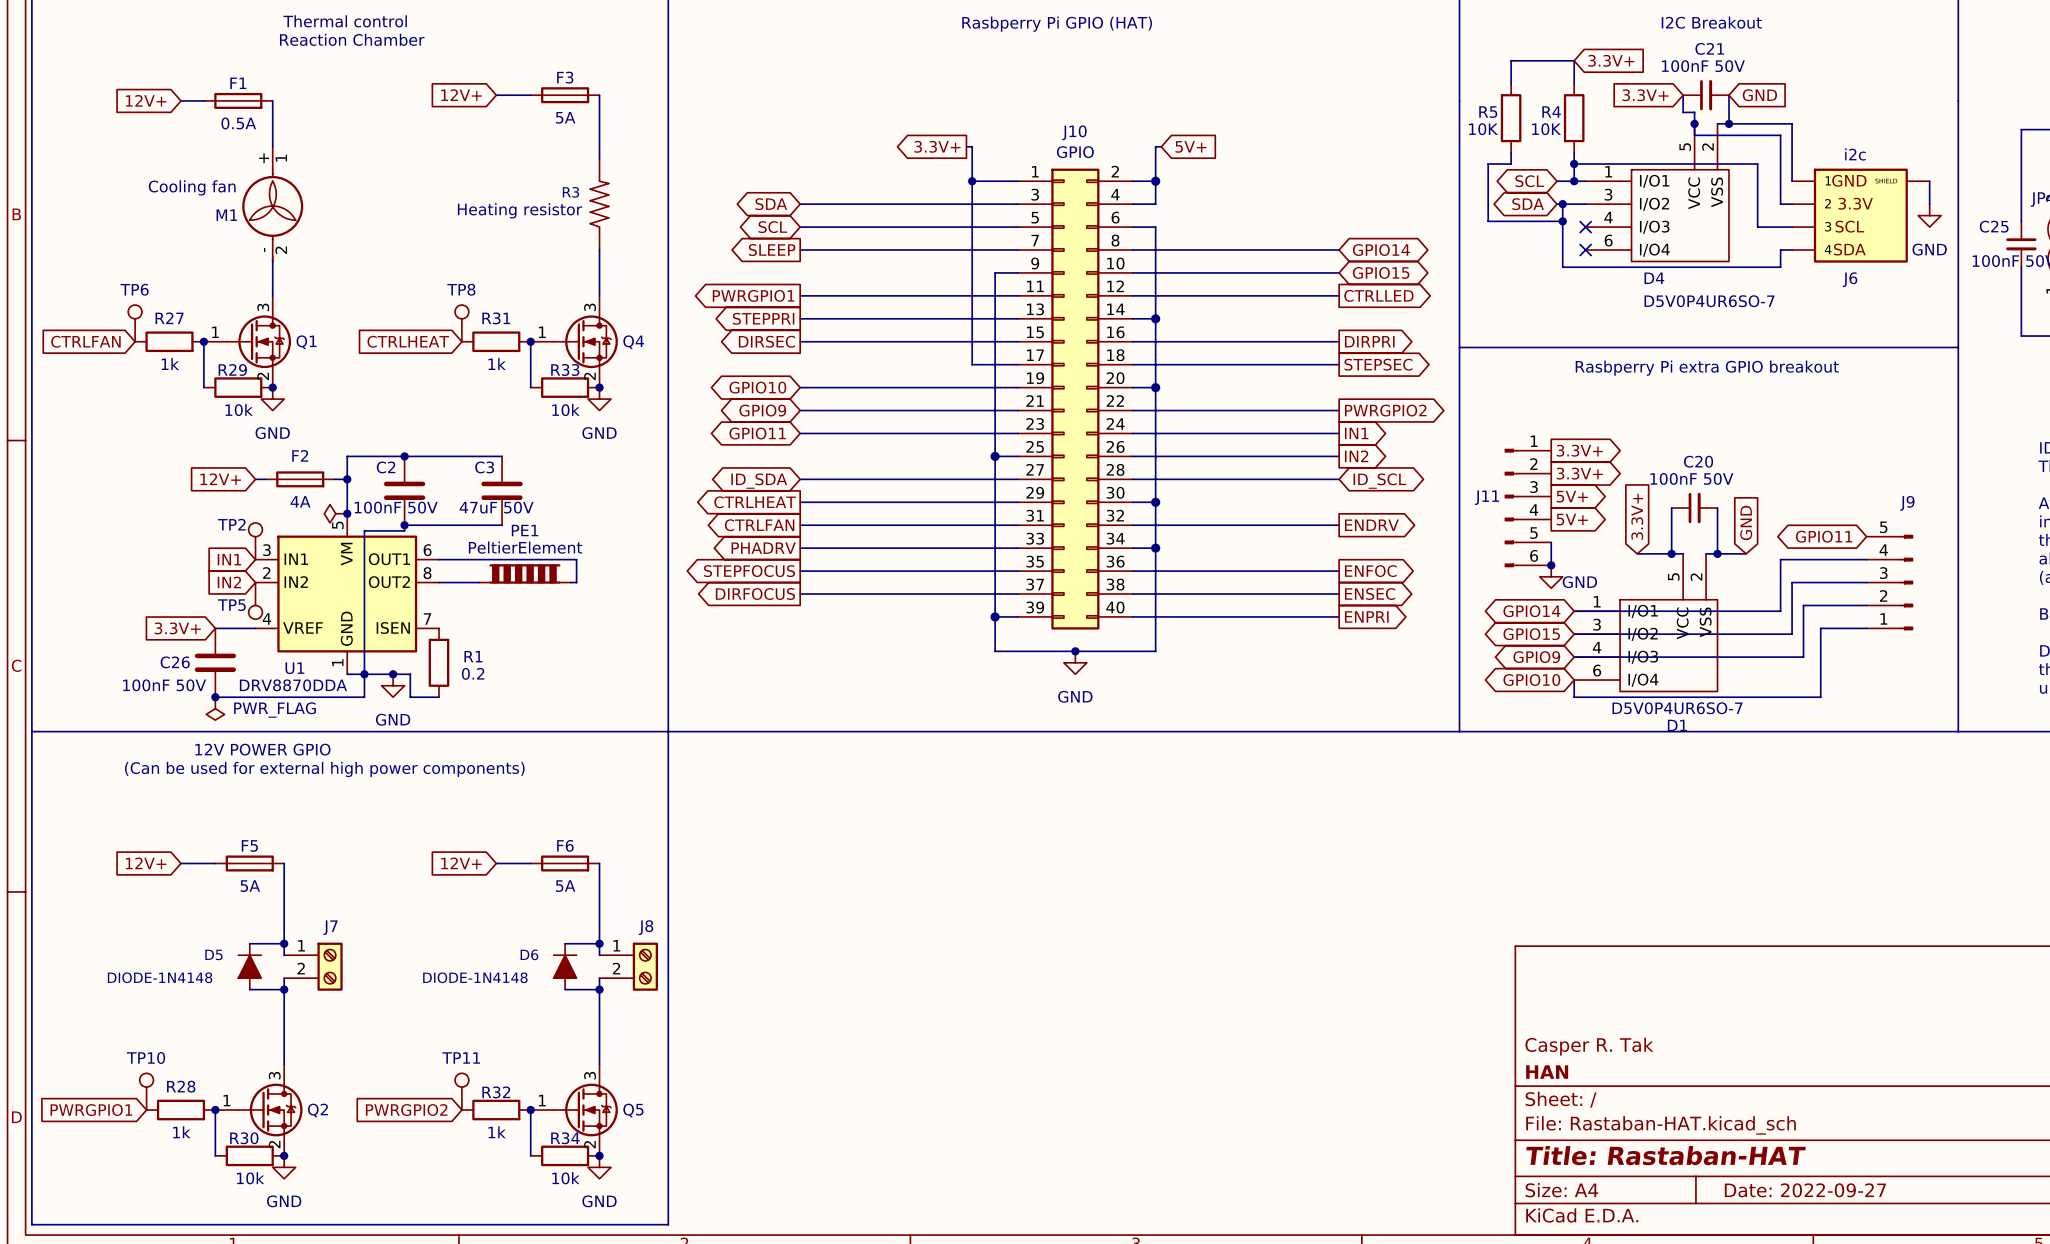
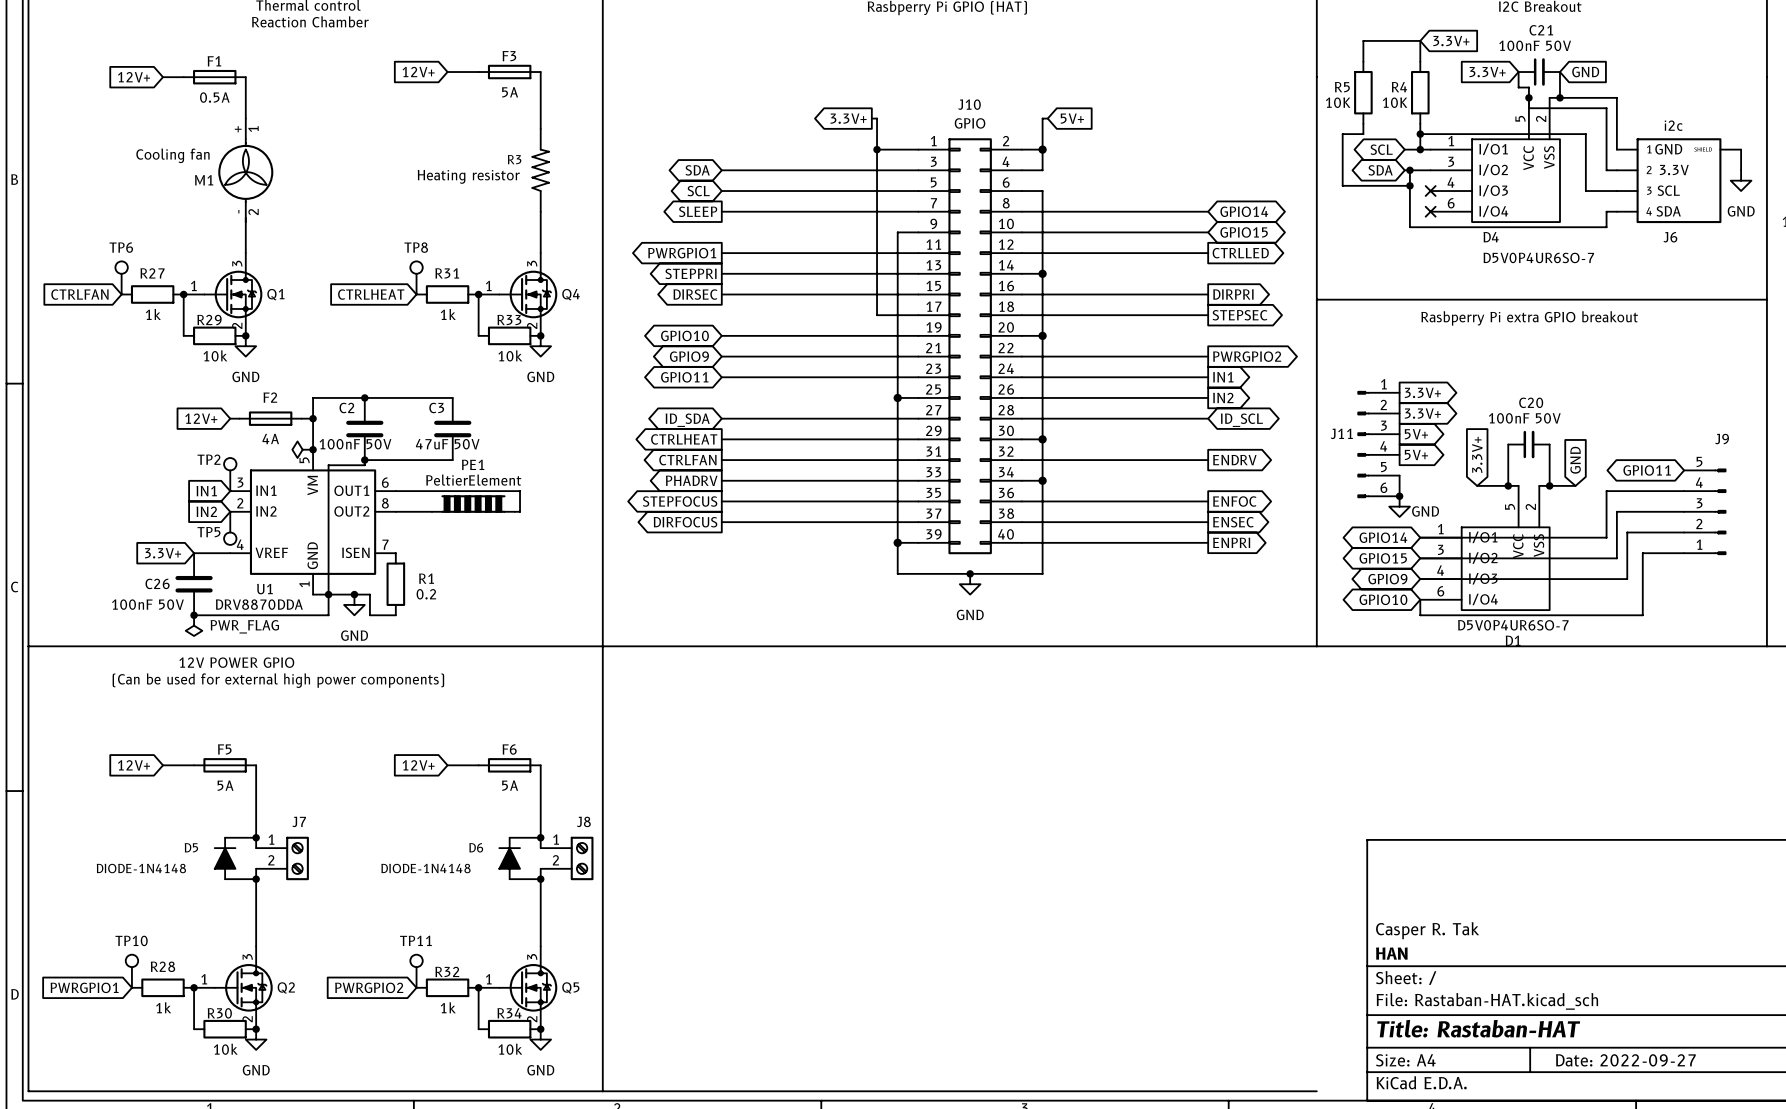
line: none -> (602, 1091) (1316, 1091)

